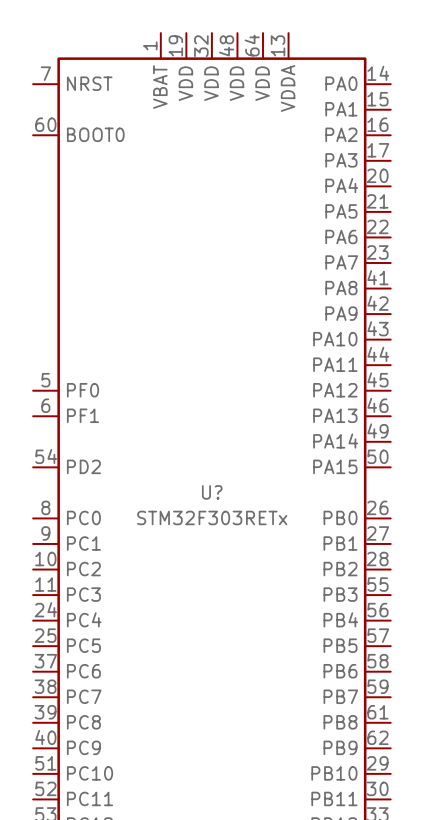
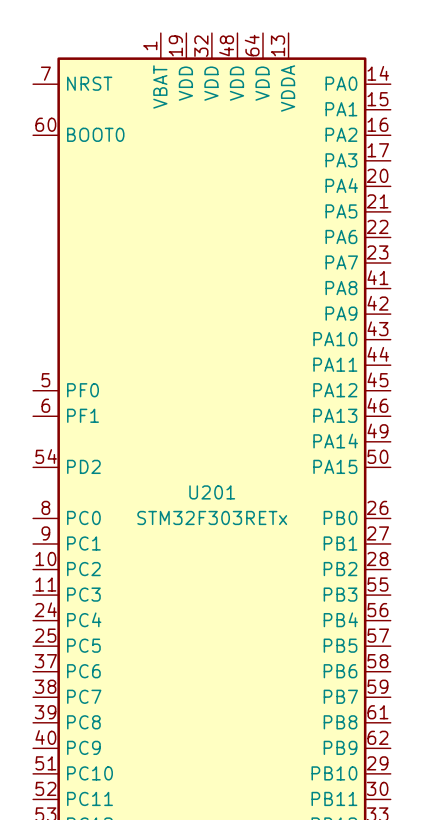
U? name: U? (212, 492) -> U201 (212, 492)

